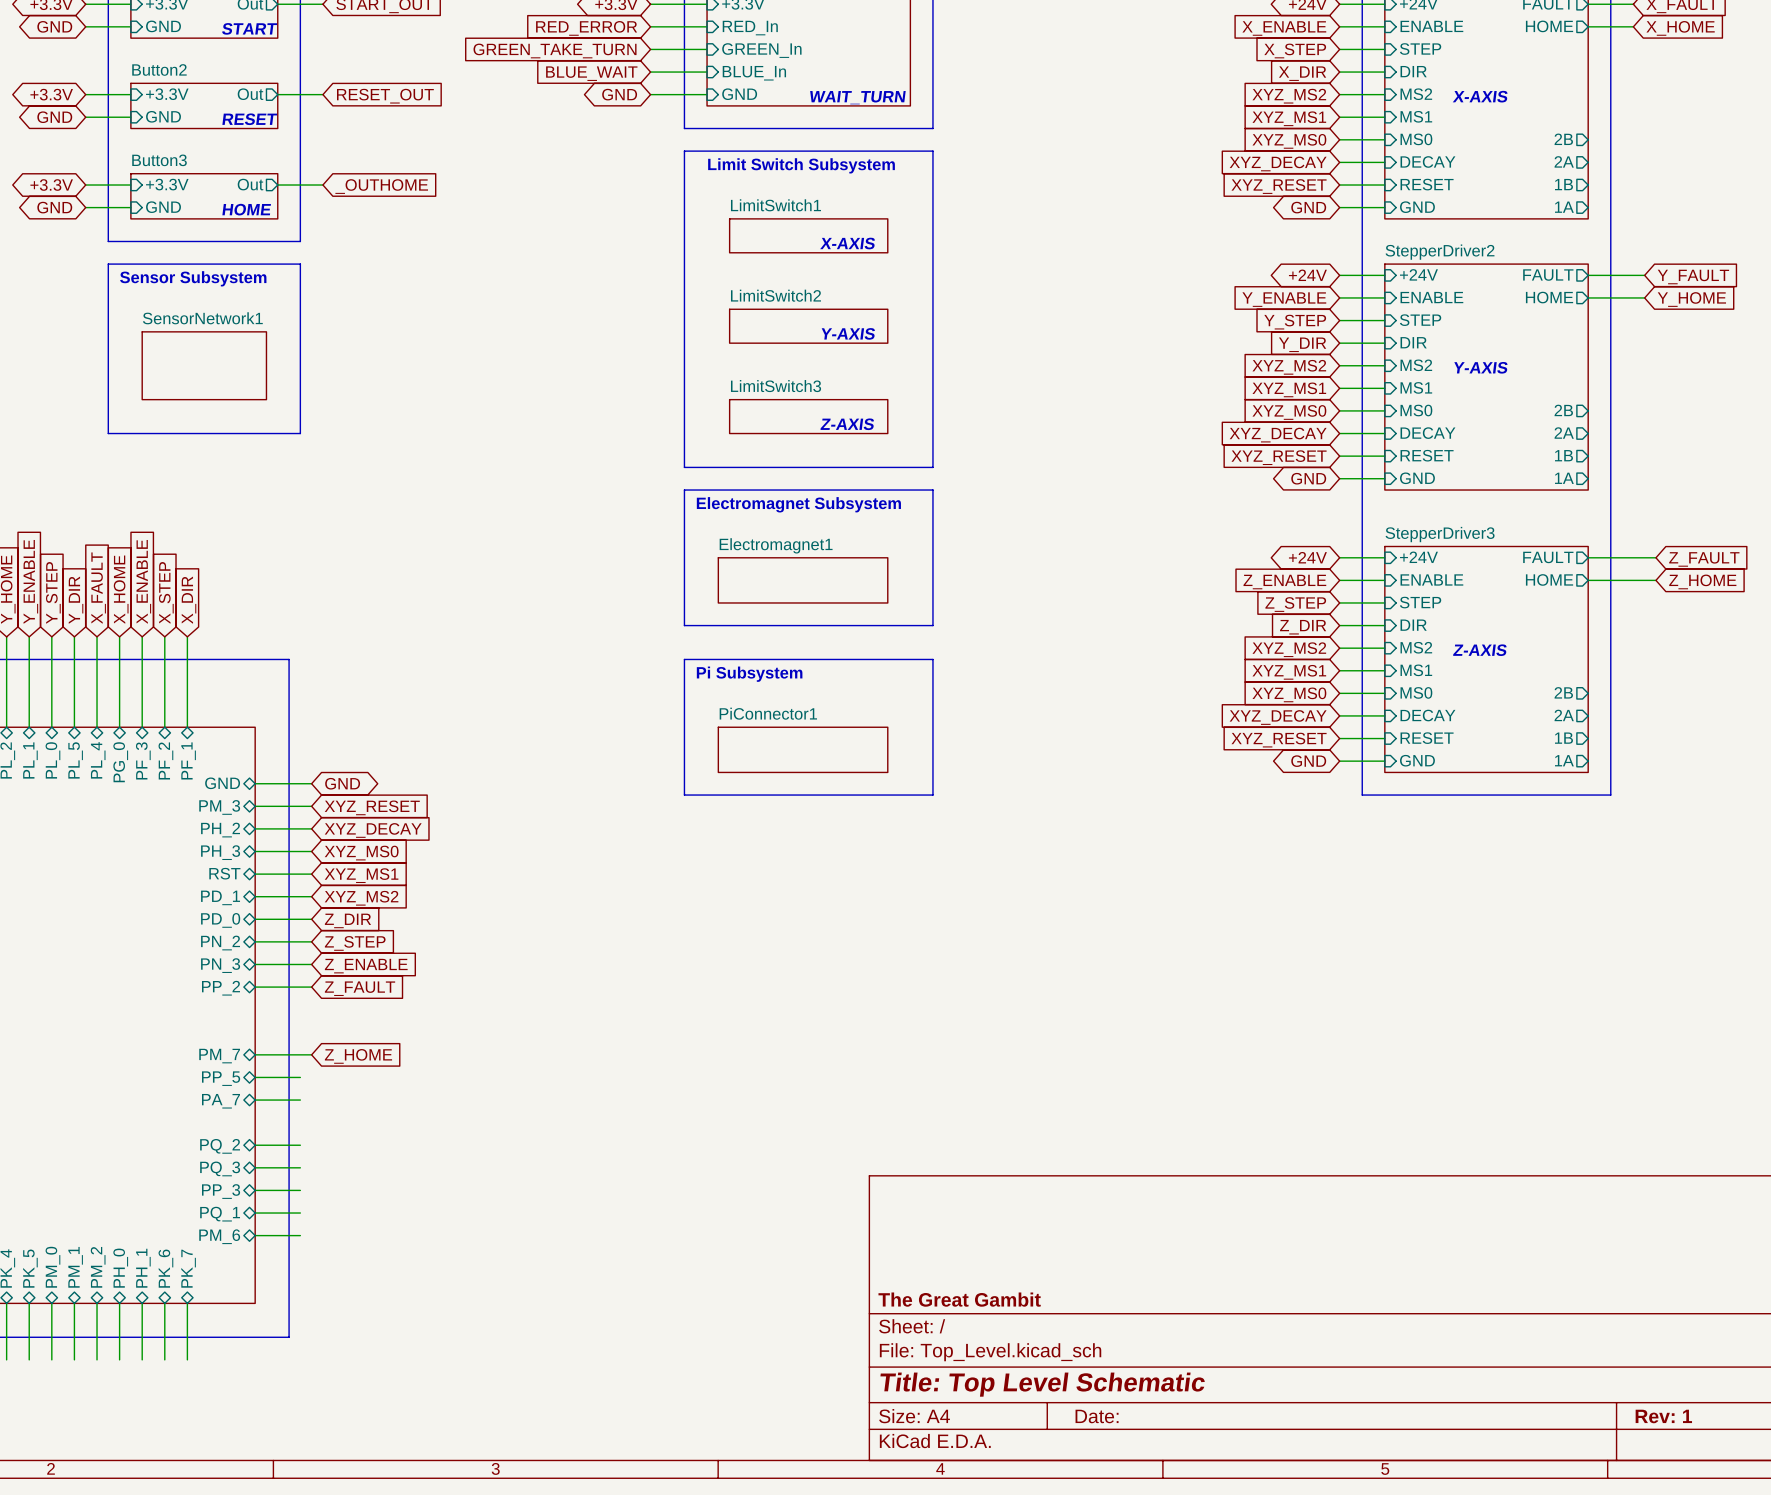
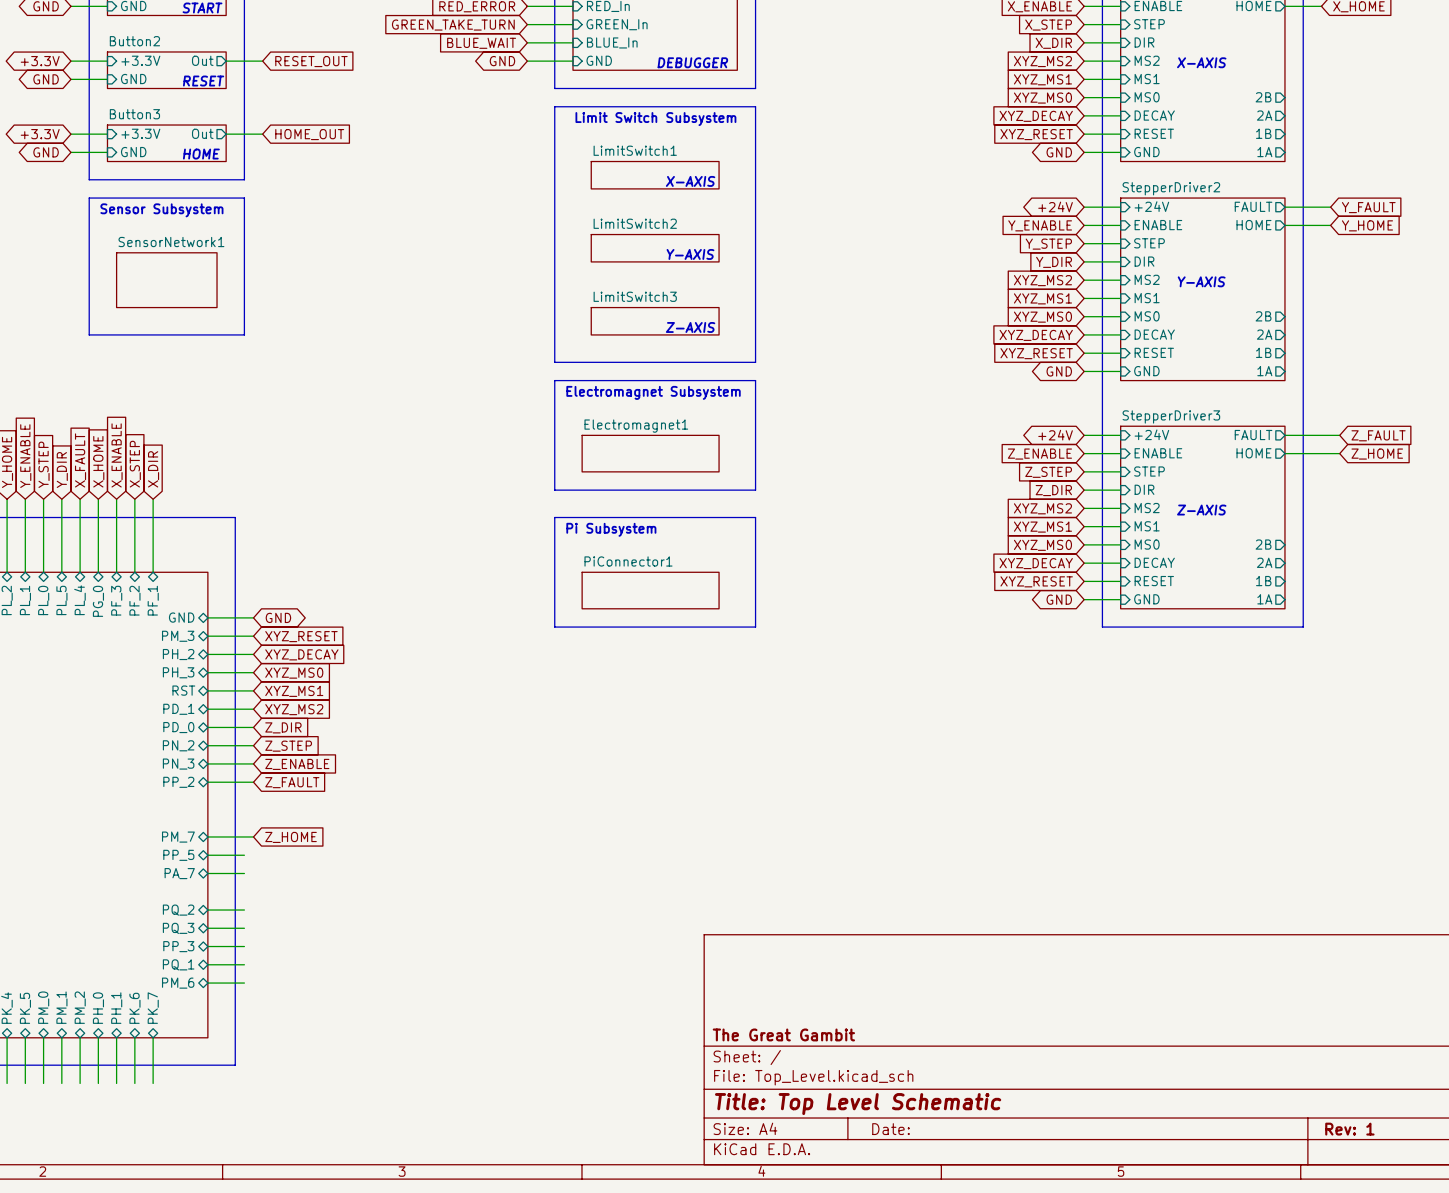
text: WAIT_TURN (857, 97) -> DEBUGGER (692, 62)
global label: _OUTHOME (381, 186) -> HOME_OUT (309, 134)

